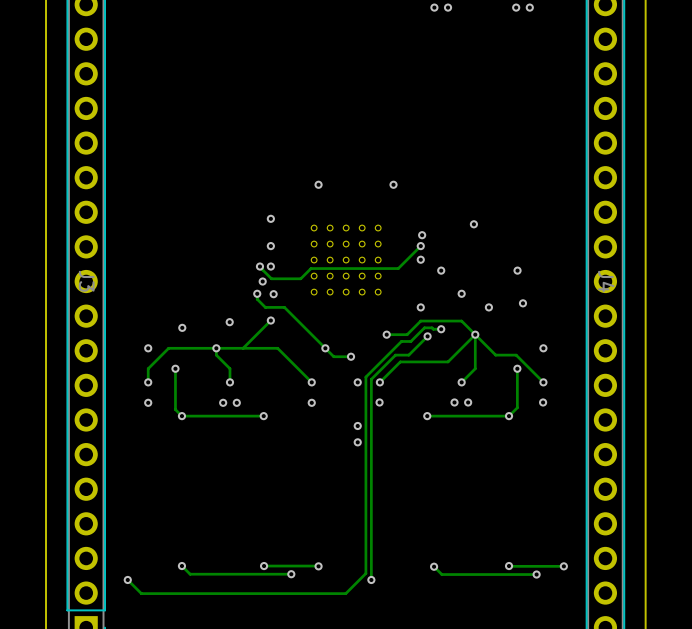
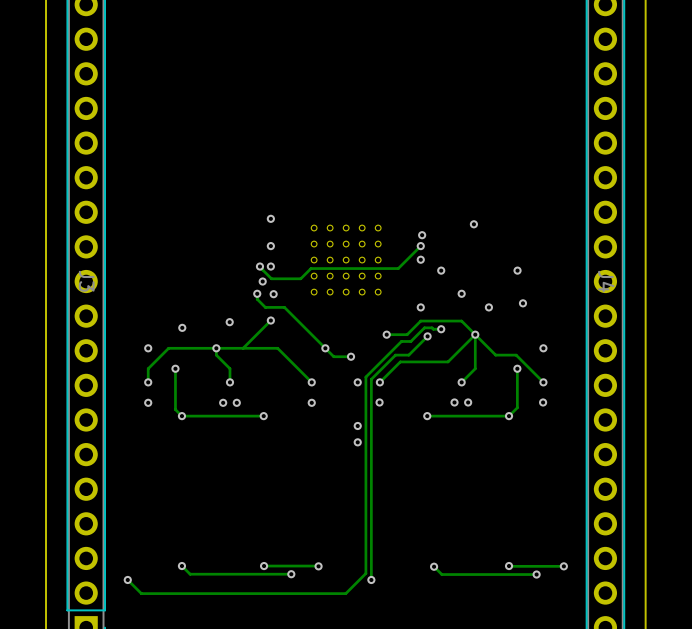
via: (434, 7) -> none
via: (448, 7) -> none
via: (516, 7) -> none
via: (529, 7) -> none
via: (318, 184) -> none
via: (393, 184) -> none

